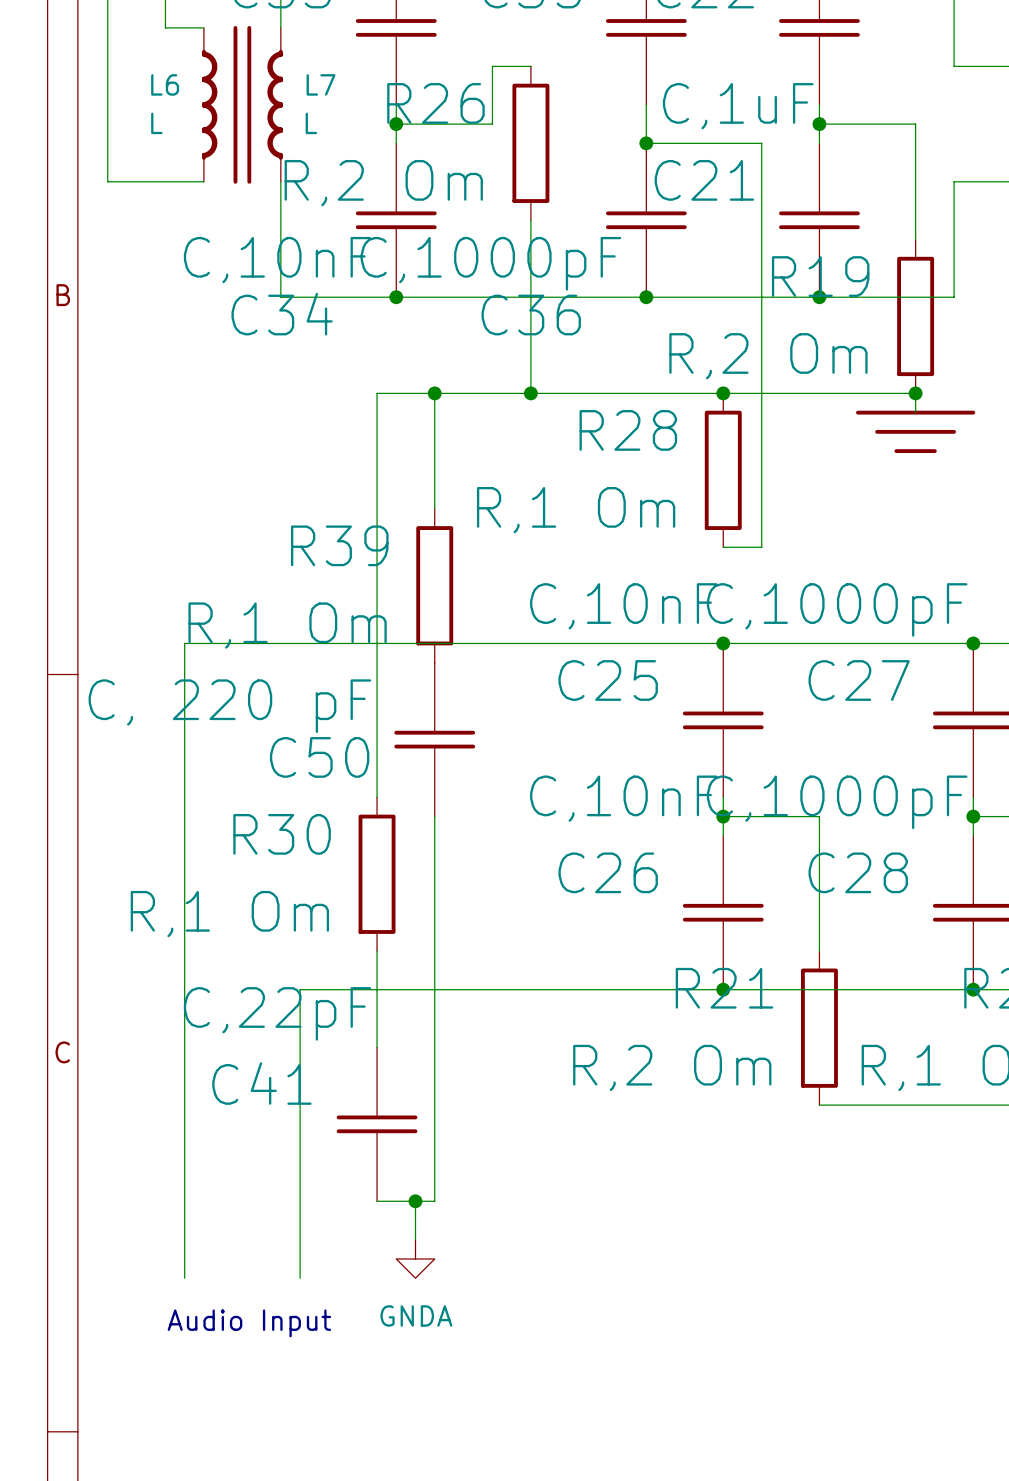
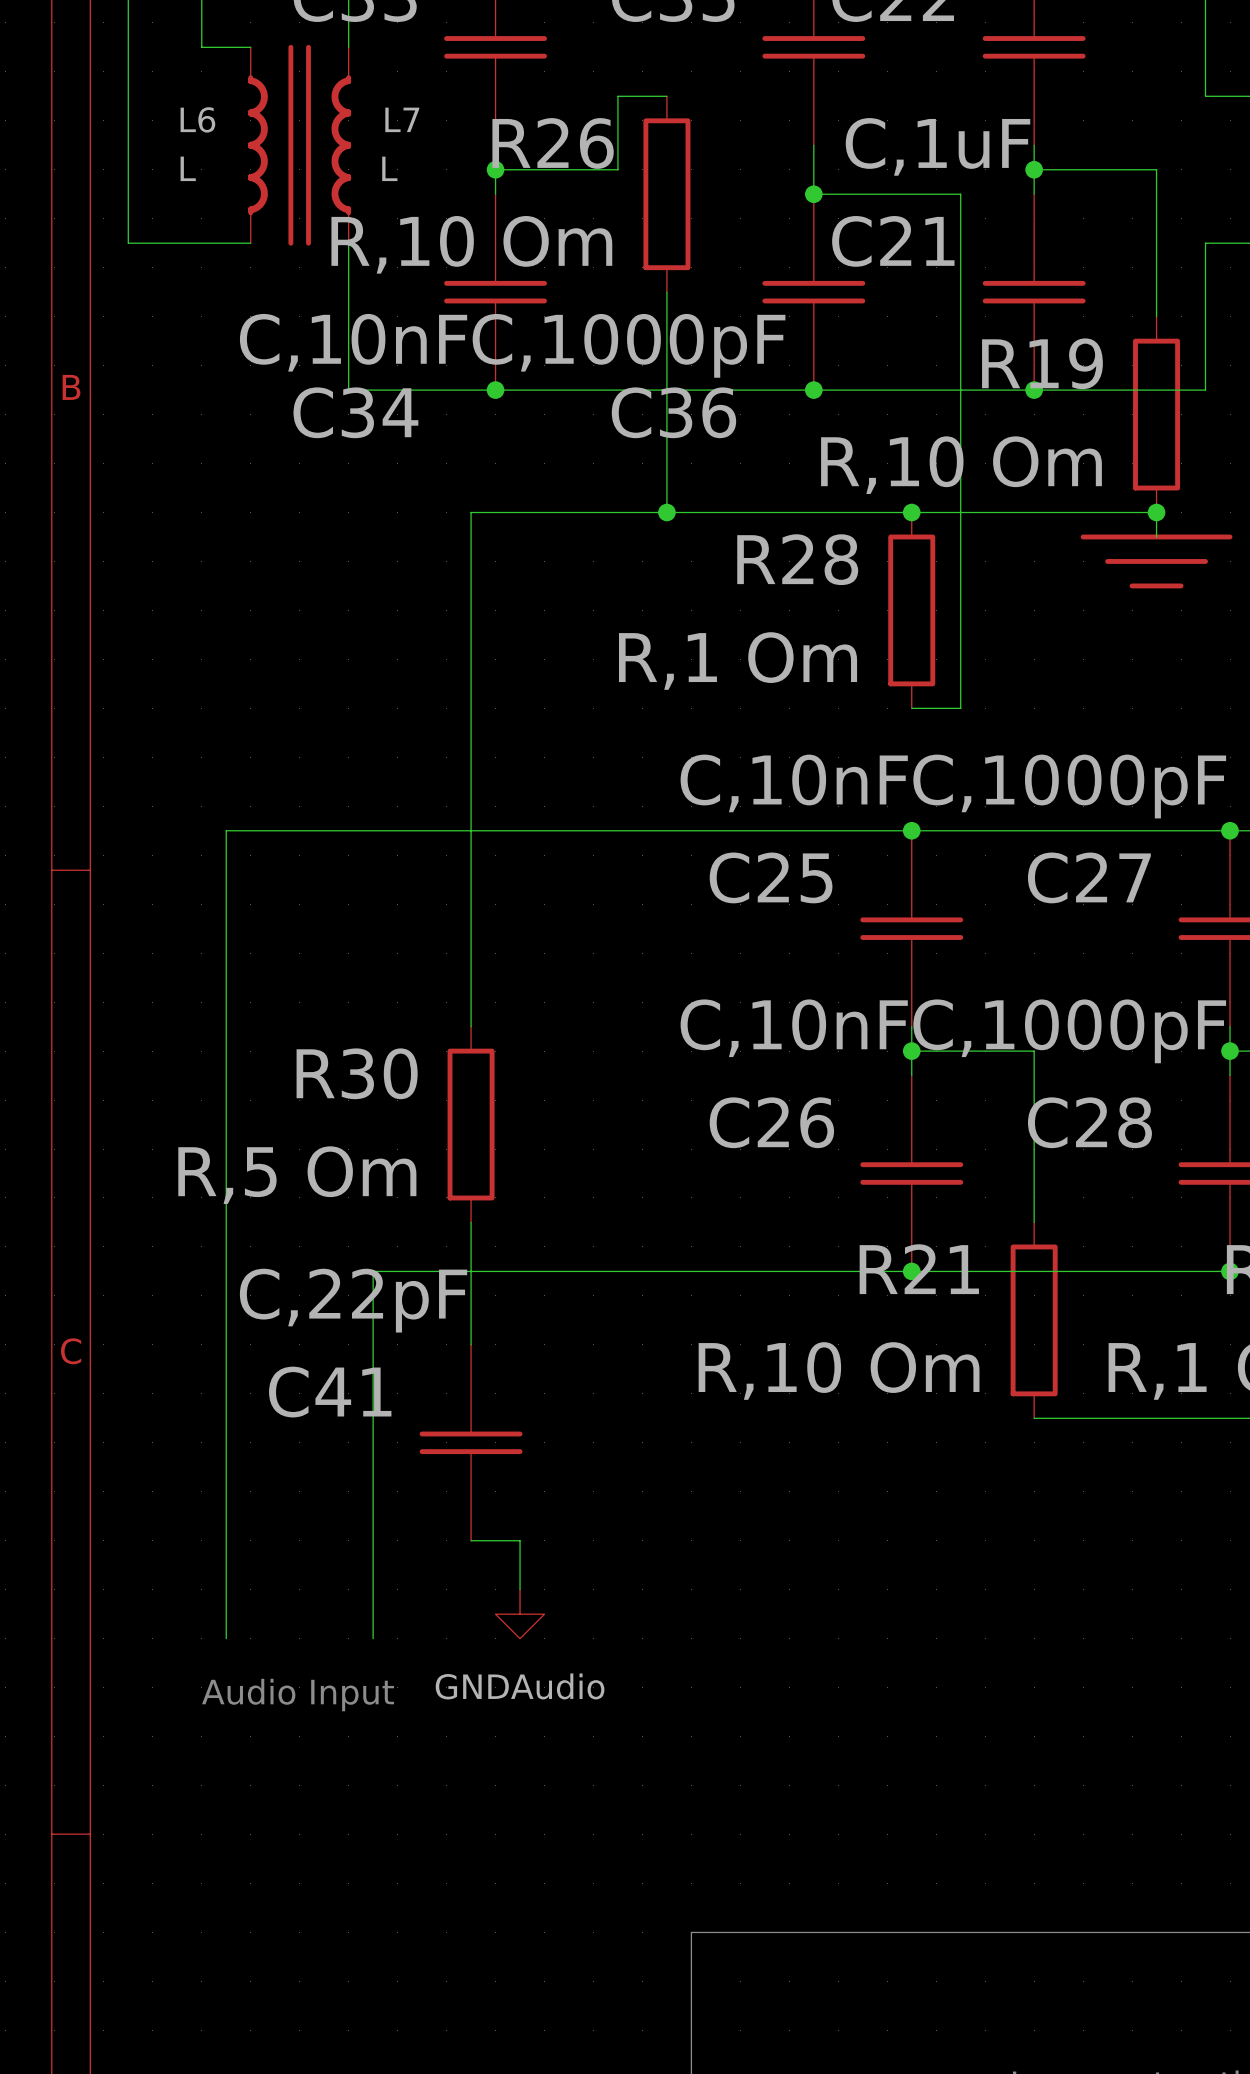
R26 value: R,2 Om (383, 183) -> R,10 Om (471, 244)
R19 value: R,2 Om (768, 356) -> R,10 Om (961, 465)
wire: (434, 393) (434, 508) -> none
junction: (434, 393) -> none
R39: R,1 Om (434, 585) -> none
C50: C, 220 pF (434, 739) -> none
wire: (434, 816) (434, 1201) (415, 1201) -> none
R30 value: R,1 Om (229, 914) -> R,5 Om (297, 1175)
R21 value: R,2 Om (672, 1067) -> R,10 Om (839, 1371)
junction: (415, 1201) -> none
power symbol: GNDA (415, 1258) -> GNDAudio (520, 1614)

